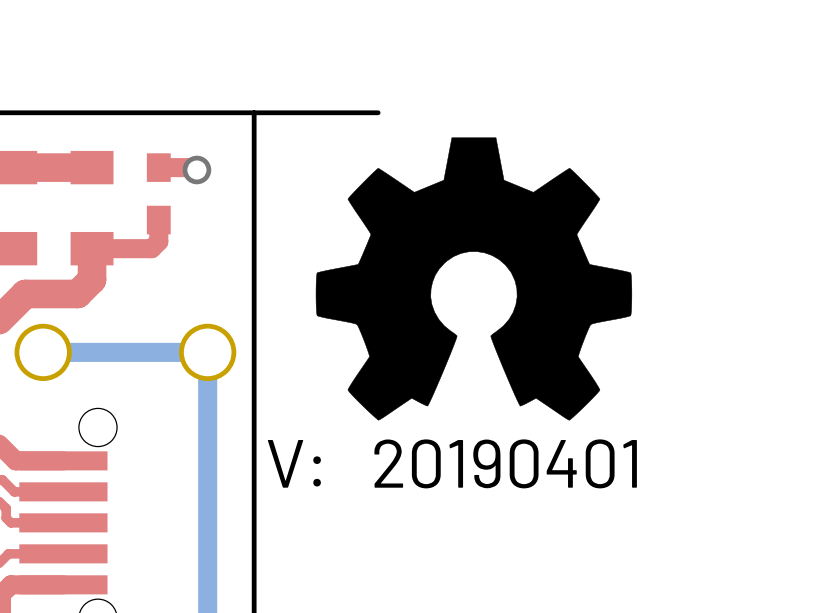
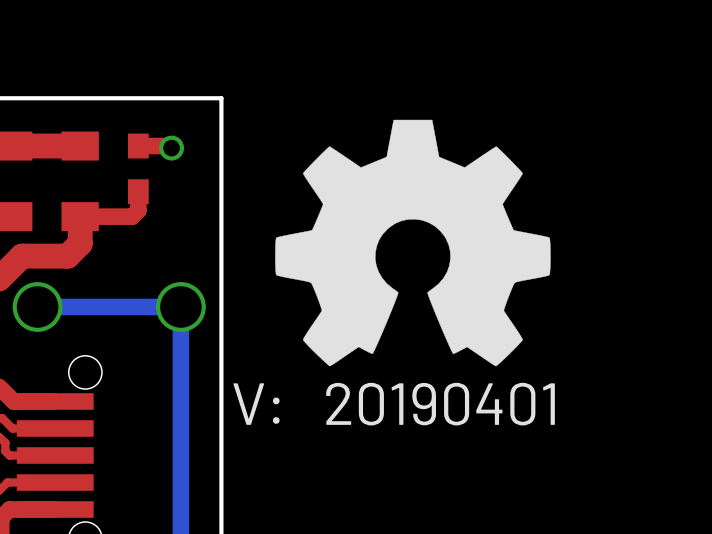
board edge: (378, 112) (254, 112) -> none

